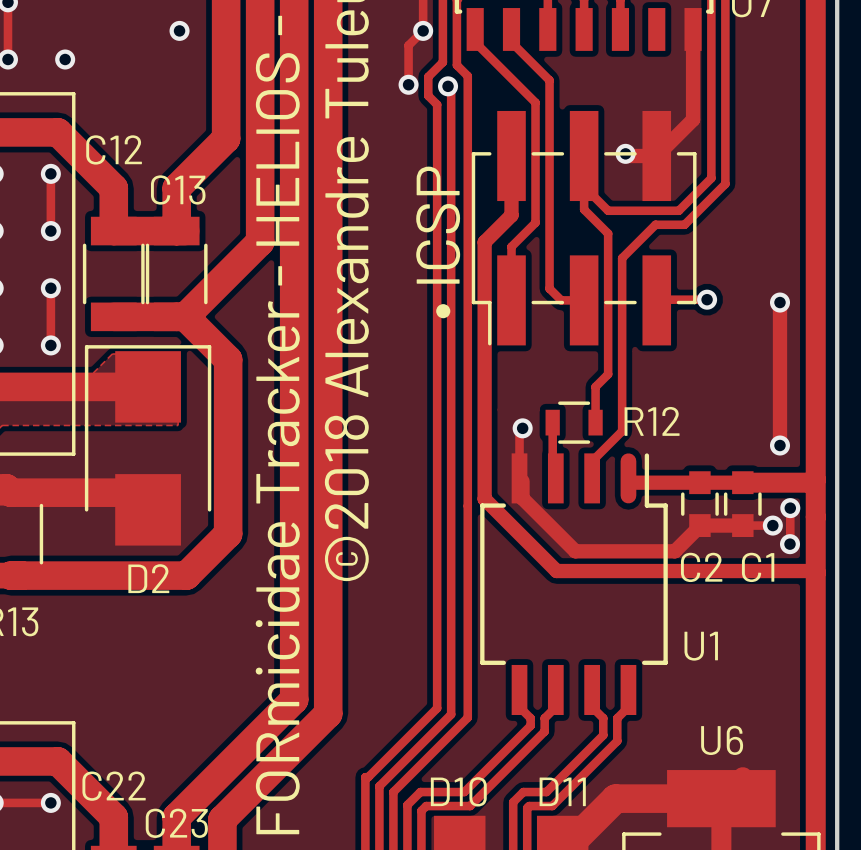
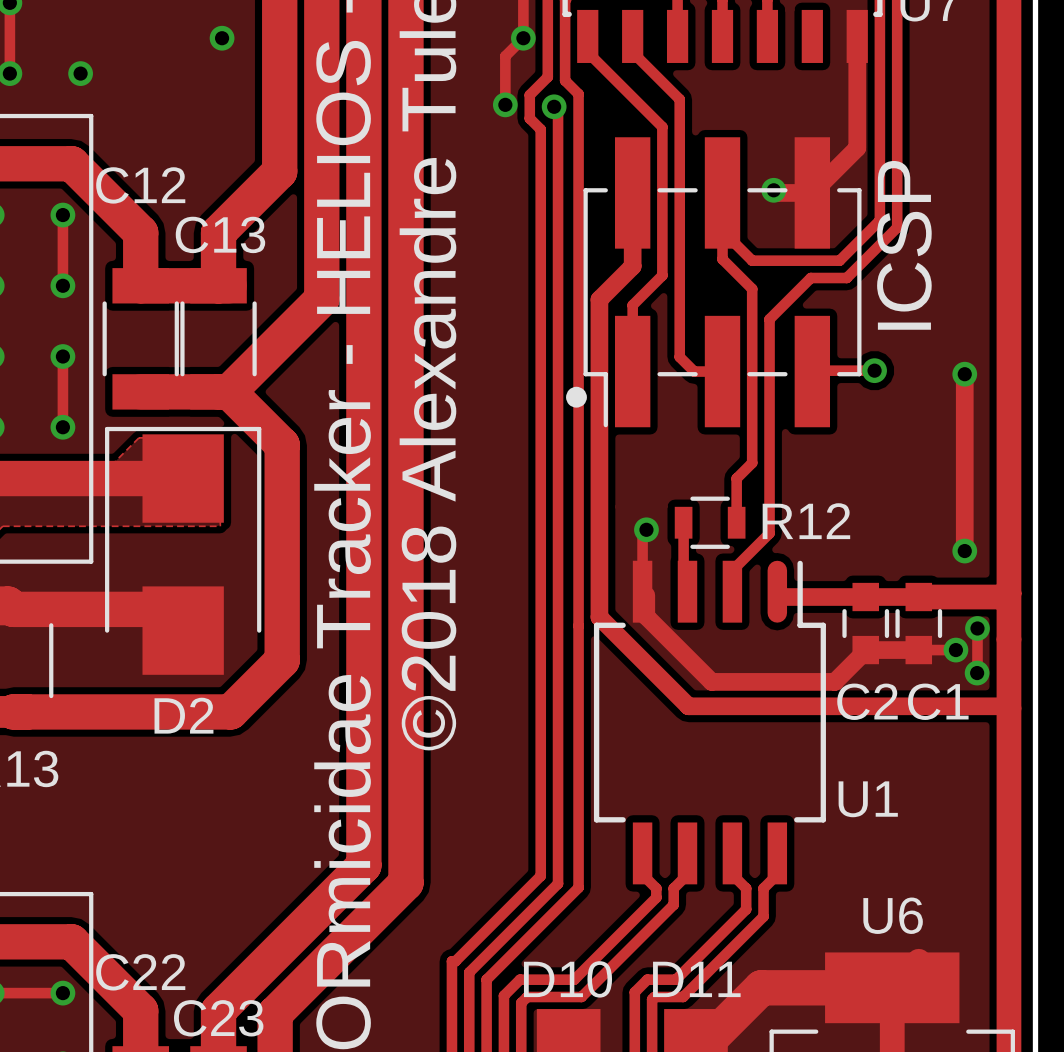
text: none -> ICSP (904, 245)
text: • ICSP (438, 242) -> none
text: none -> • (576, 397)

